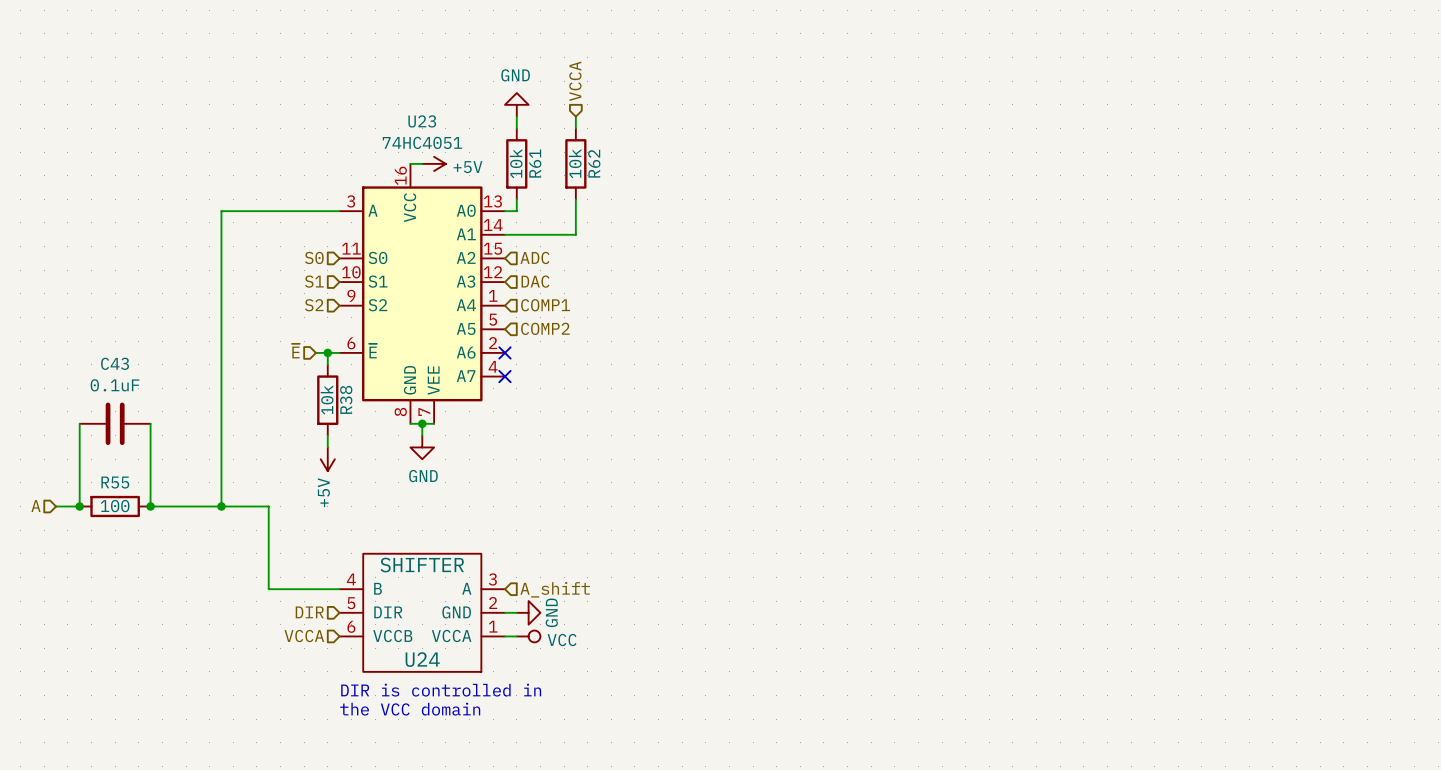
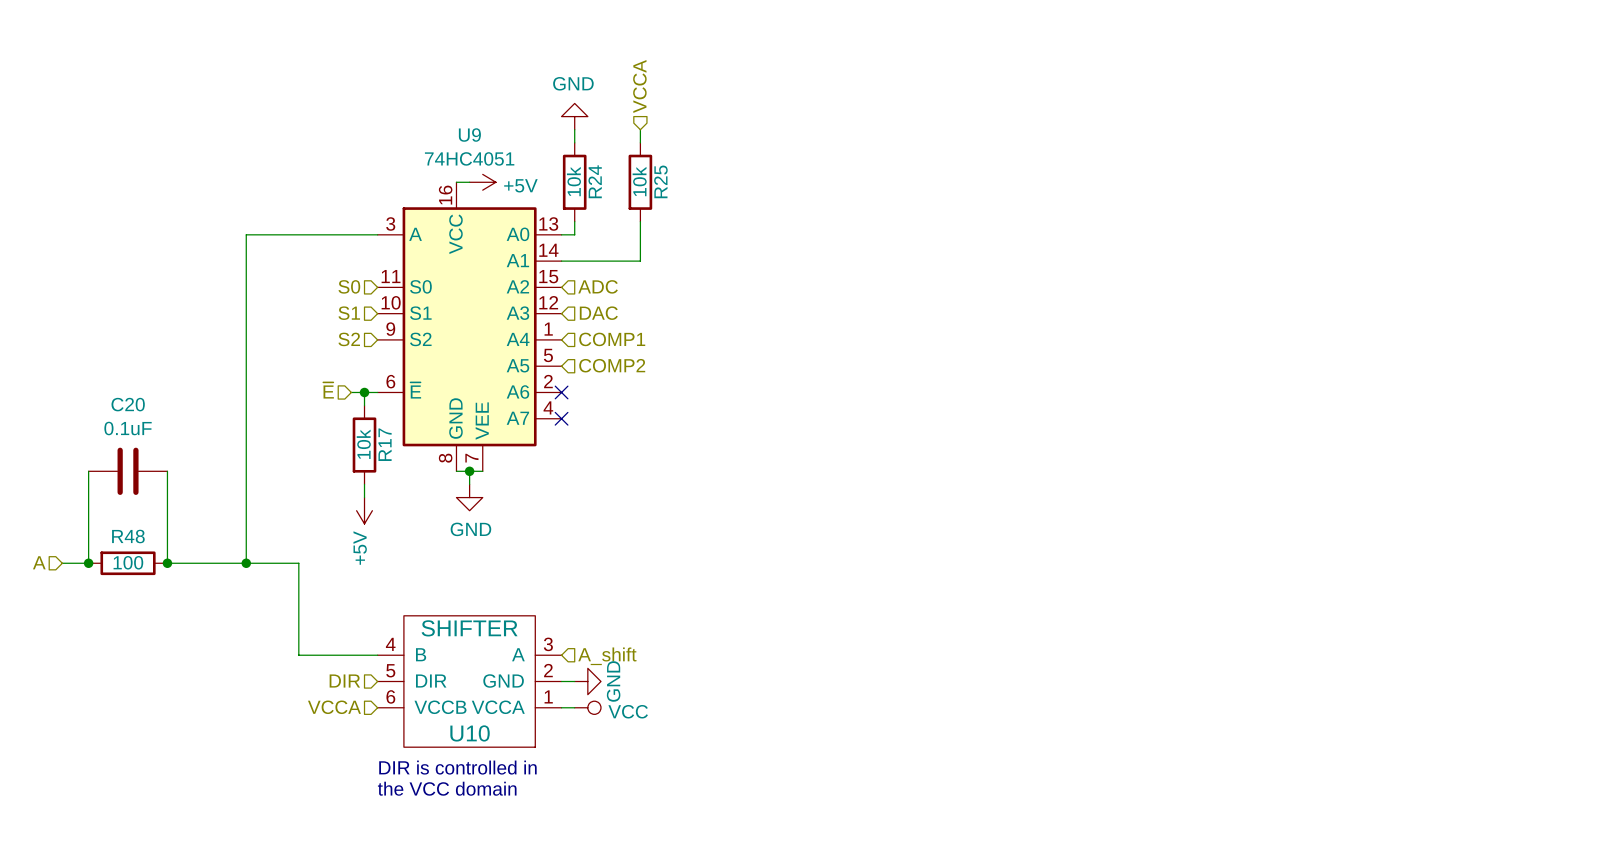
U23 name: U23 (422, 121) -> U9 (469, 135)
R61 name: R61 (535, 163) -> R24 (595, 181)
R62 name: R62 (594, 163) -> R25 (660, 181)
C43 name: C43 (115, 363) -> C20 (128, 404)
R38 name: R38 (346, 399) -> R17 (385, 444)
R55 name: R55 (115, 482) -> R48 (128, 536)
U24 name: U24 (422, 659) -> U10 (470, 733)

